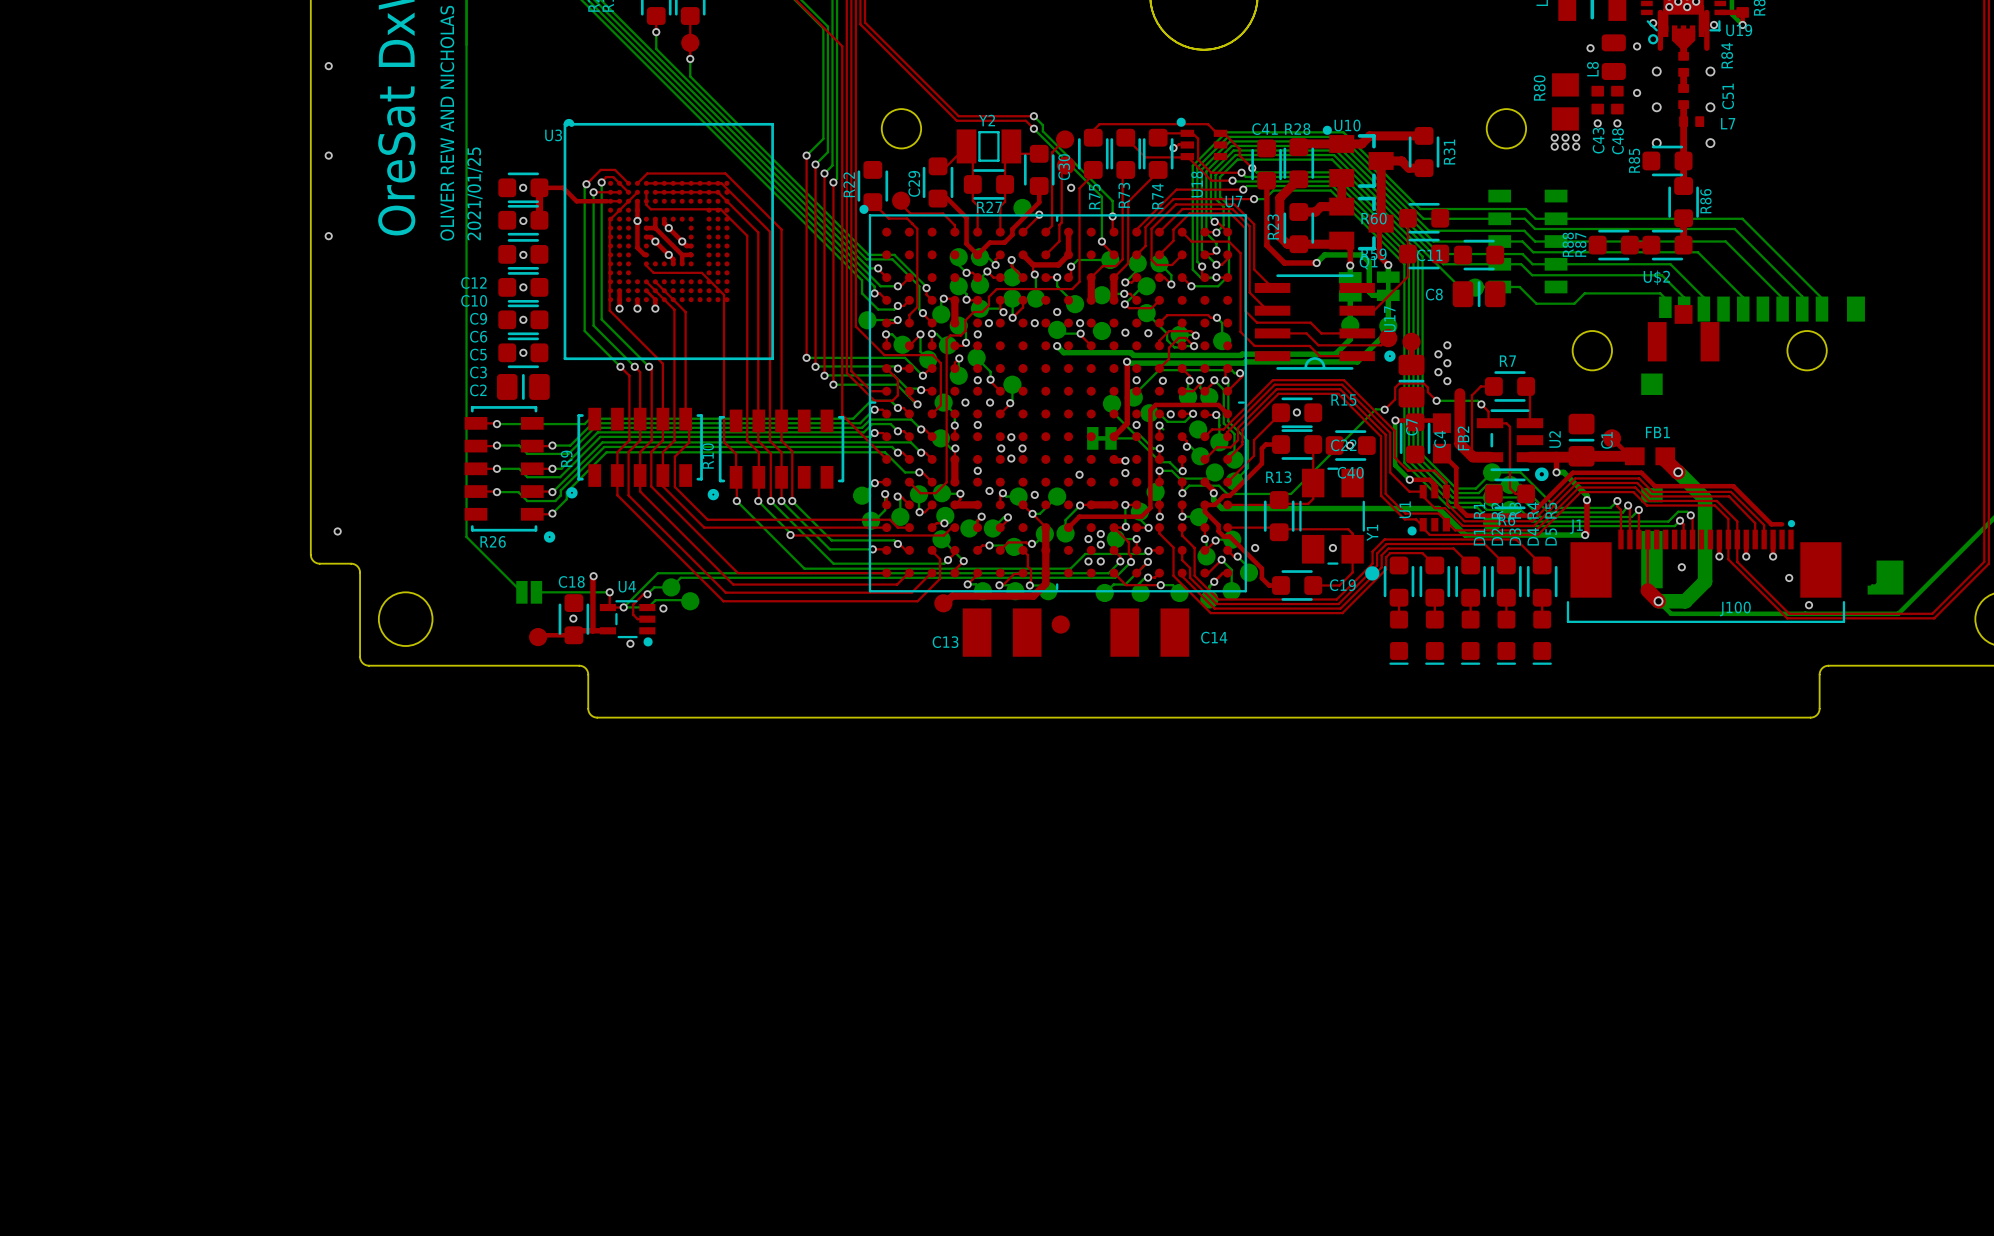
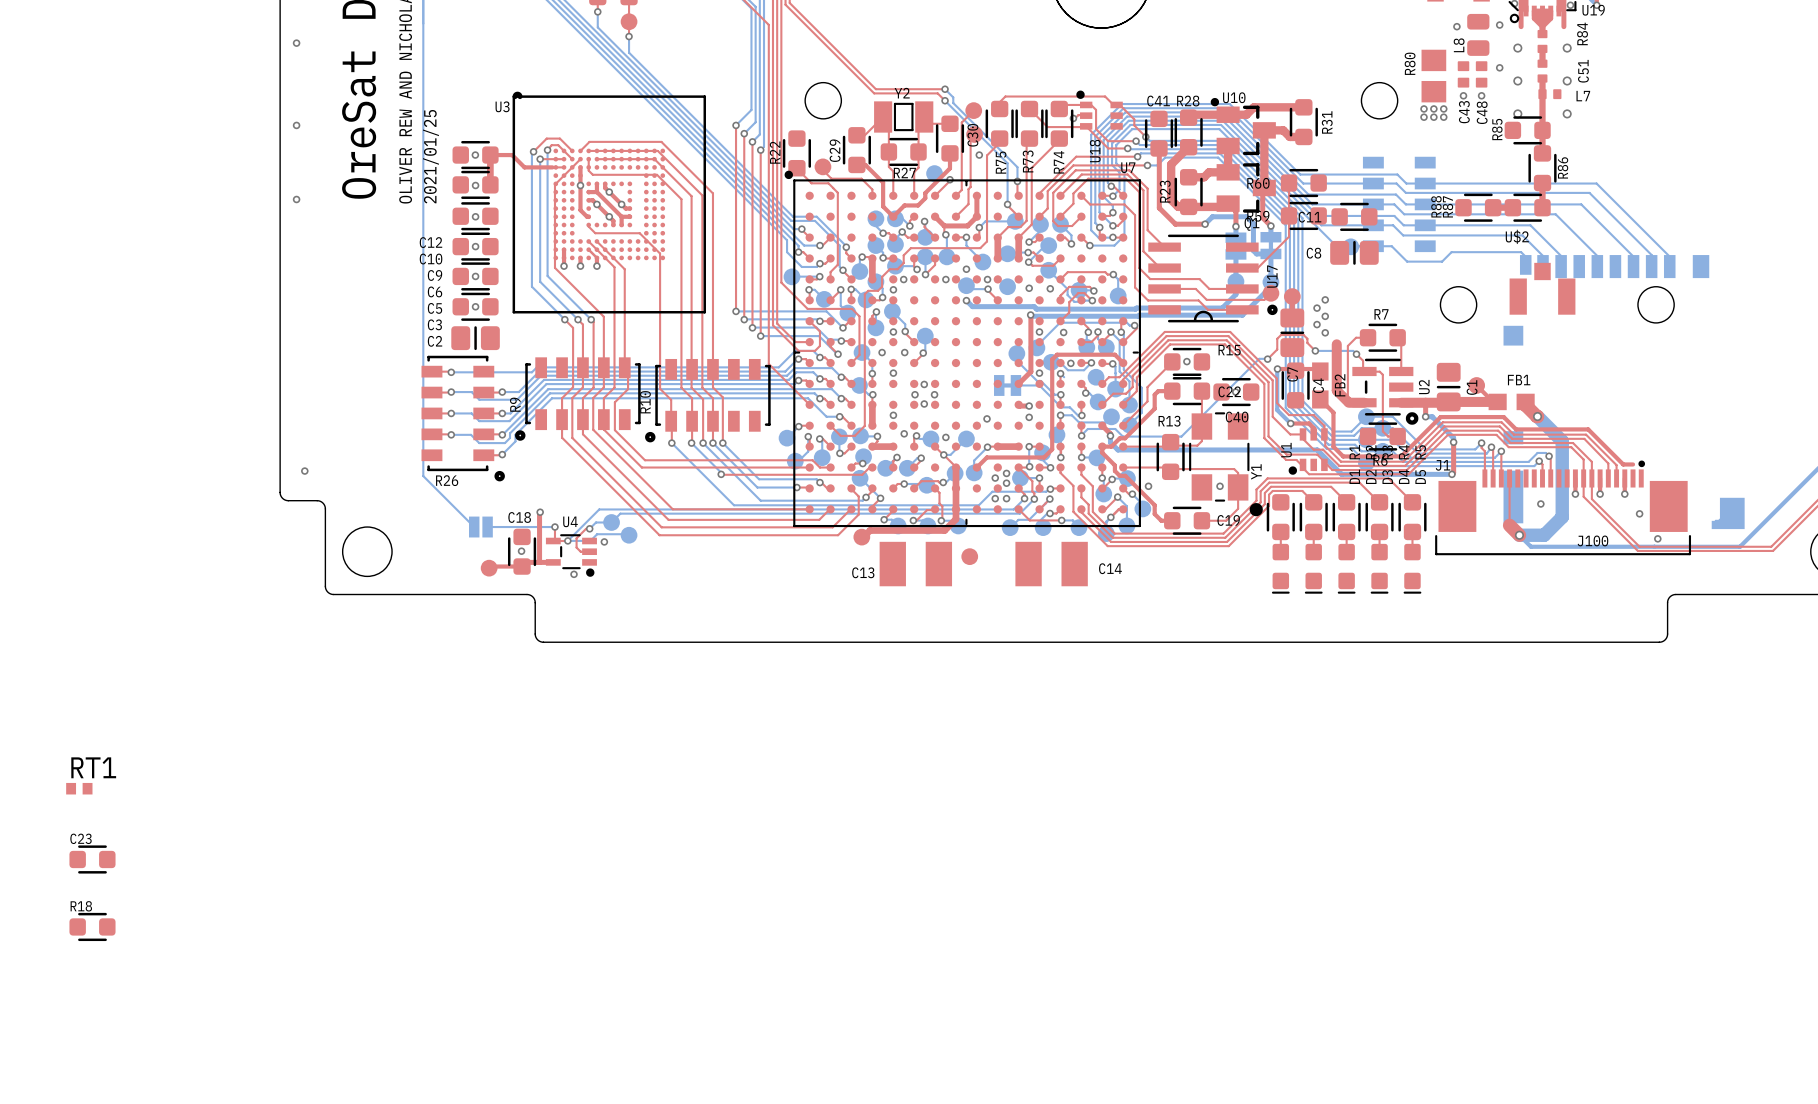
RT1: none -> (79, 788)
C23: none -> (92, 859)
R18: none -> (92, 926)

